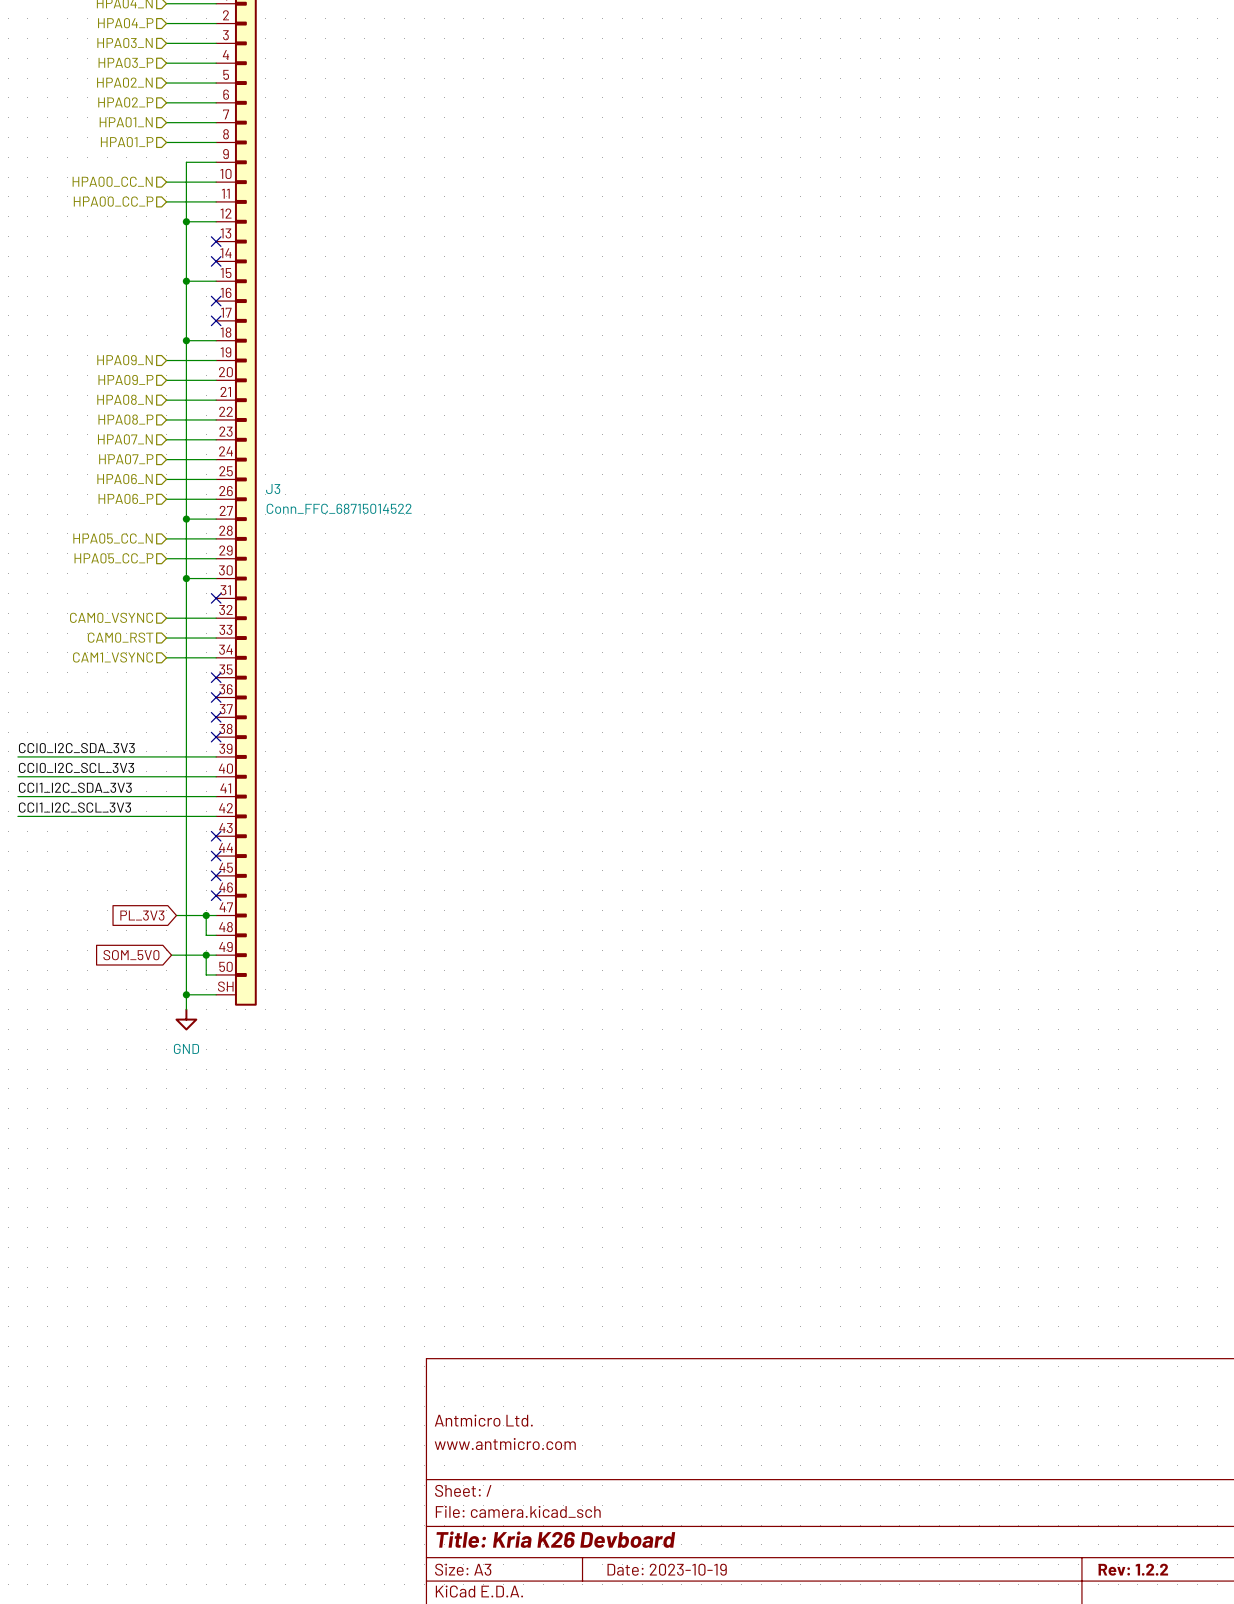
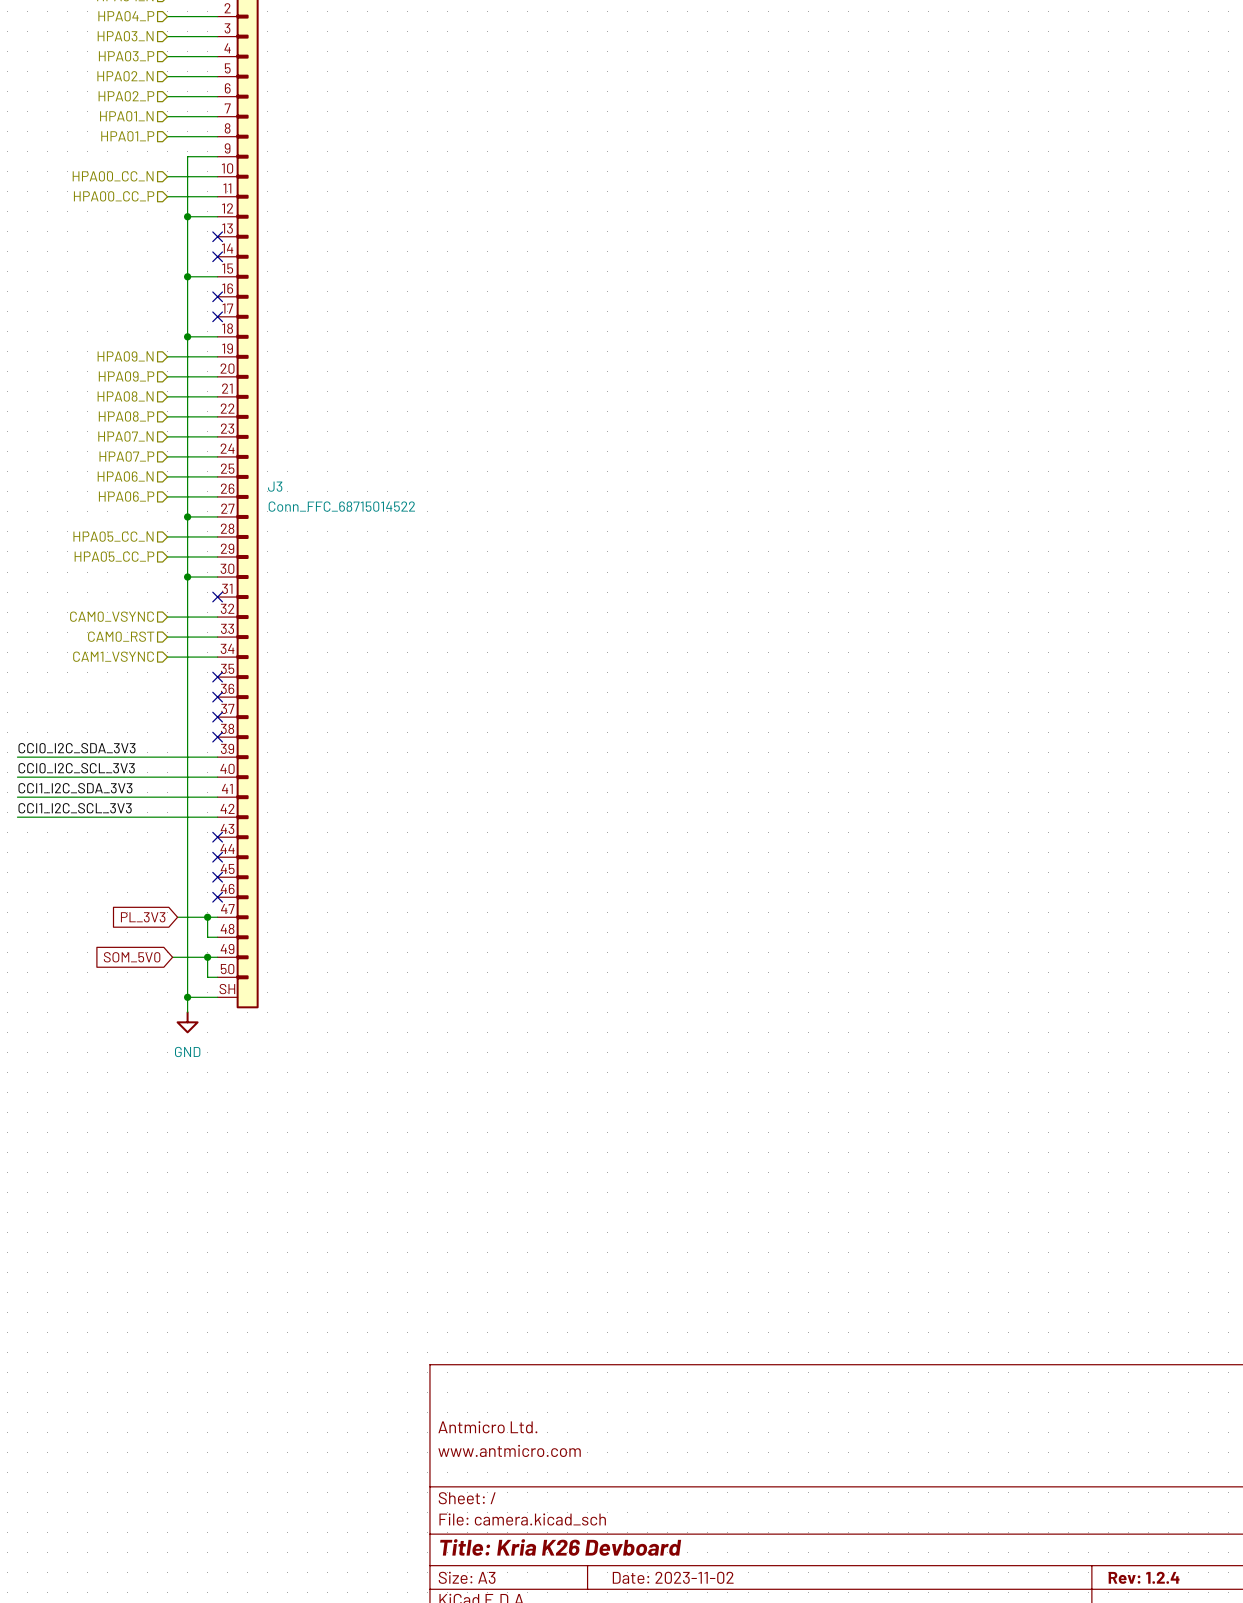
title block: Date: 2023-10-19 (667, 1569) -> Date: 2023-11-02 (673, 1577)
title block: Rev: 1.2.2 (1133, 1569) -> Rev: 1.2.4 (1144, 1577)

